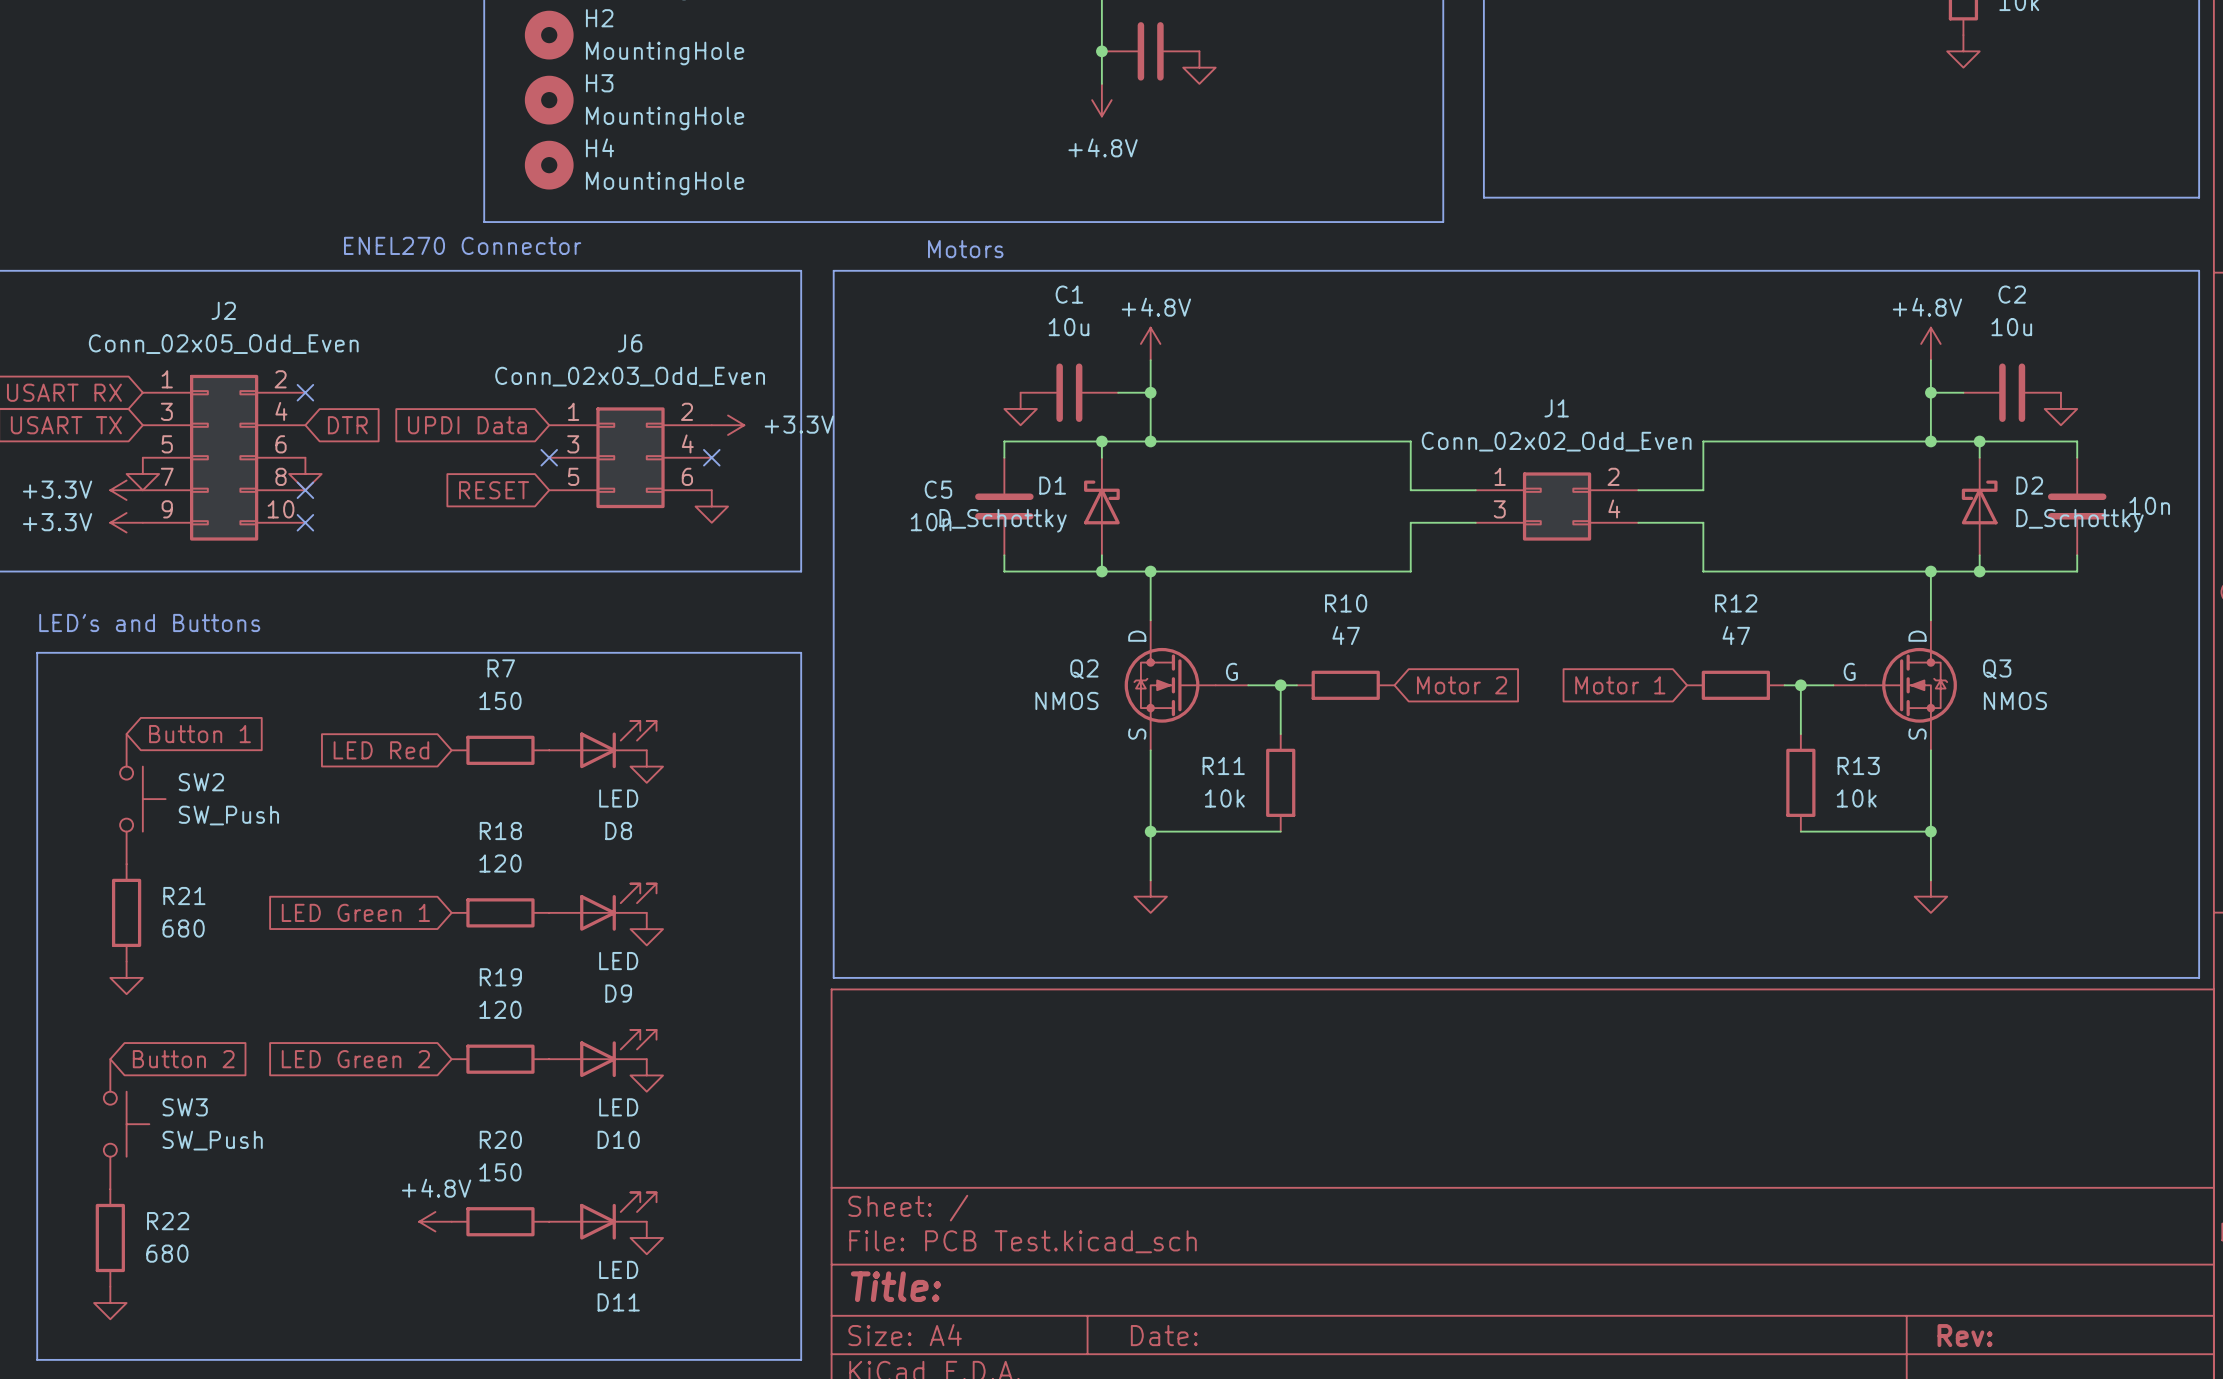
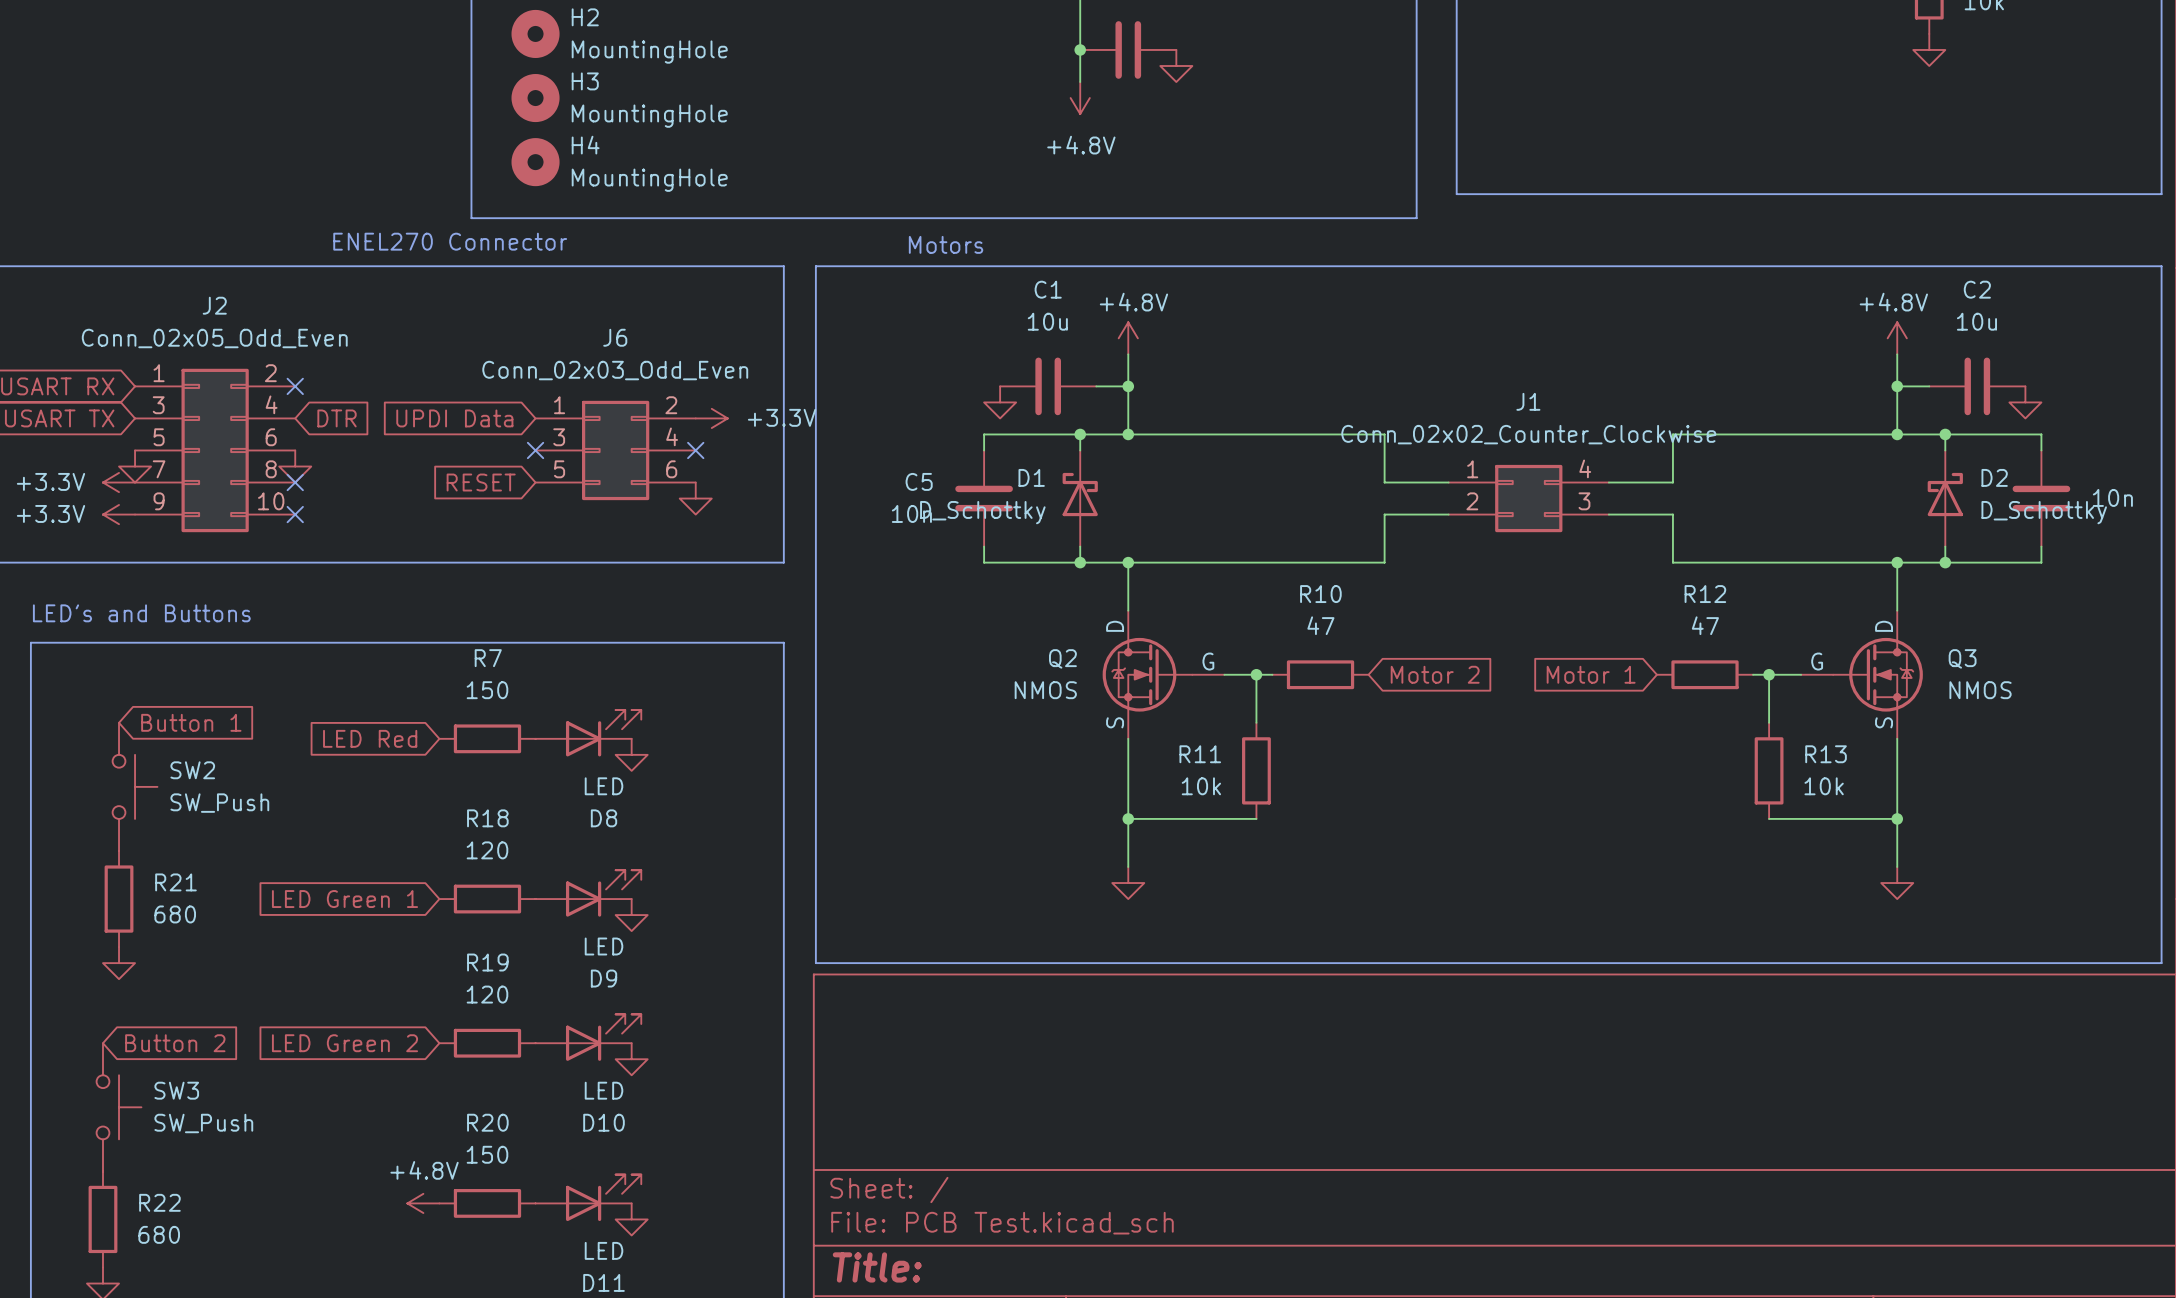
J1 value: Conn_02x02_Odd_Even (1556, 441) -> Conn_02x02_Counter_Clockwise (1528, 434)
J1 pin number: 2 (1613, 476) -> 4 (1585, 468)
J1 pin number: 4 (1614, 508) -> 3 (1584, 501)
J1 pin number: 3 (1499, 509) -> 2 (1472, 501)

